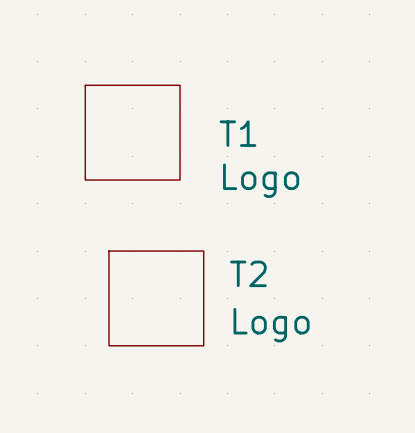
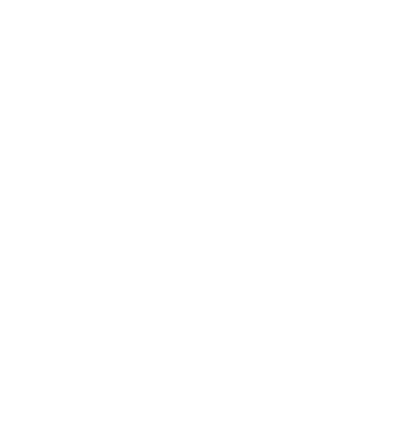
T1: Logo (132, 132) -> none
T2: Logo (156, 298) -> none

